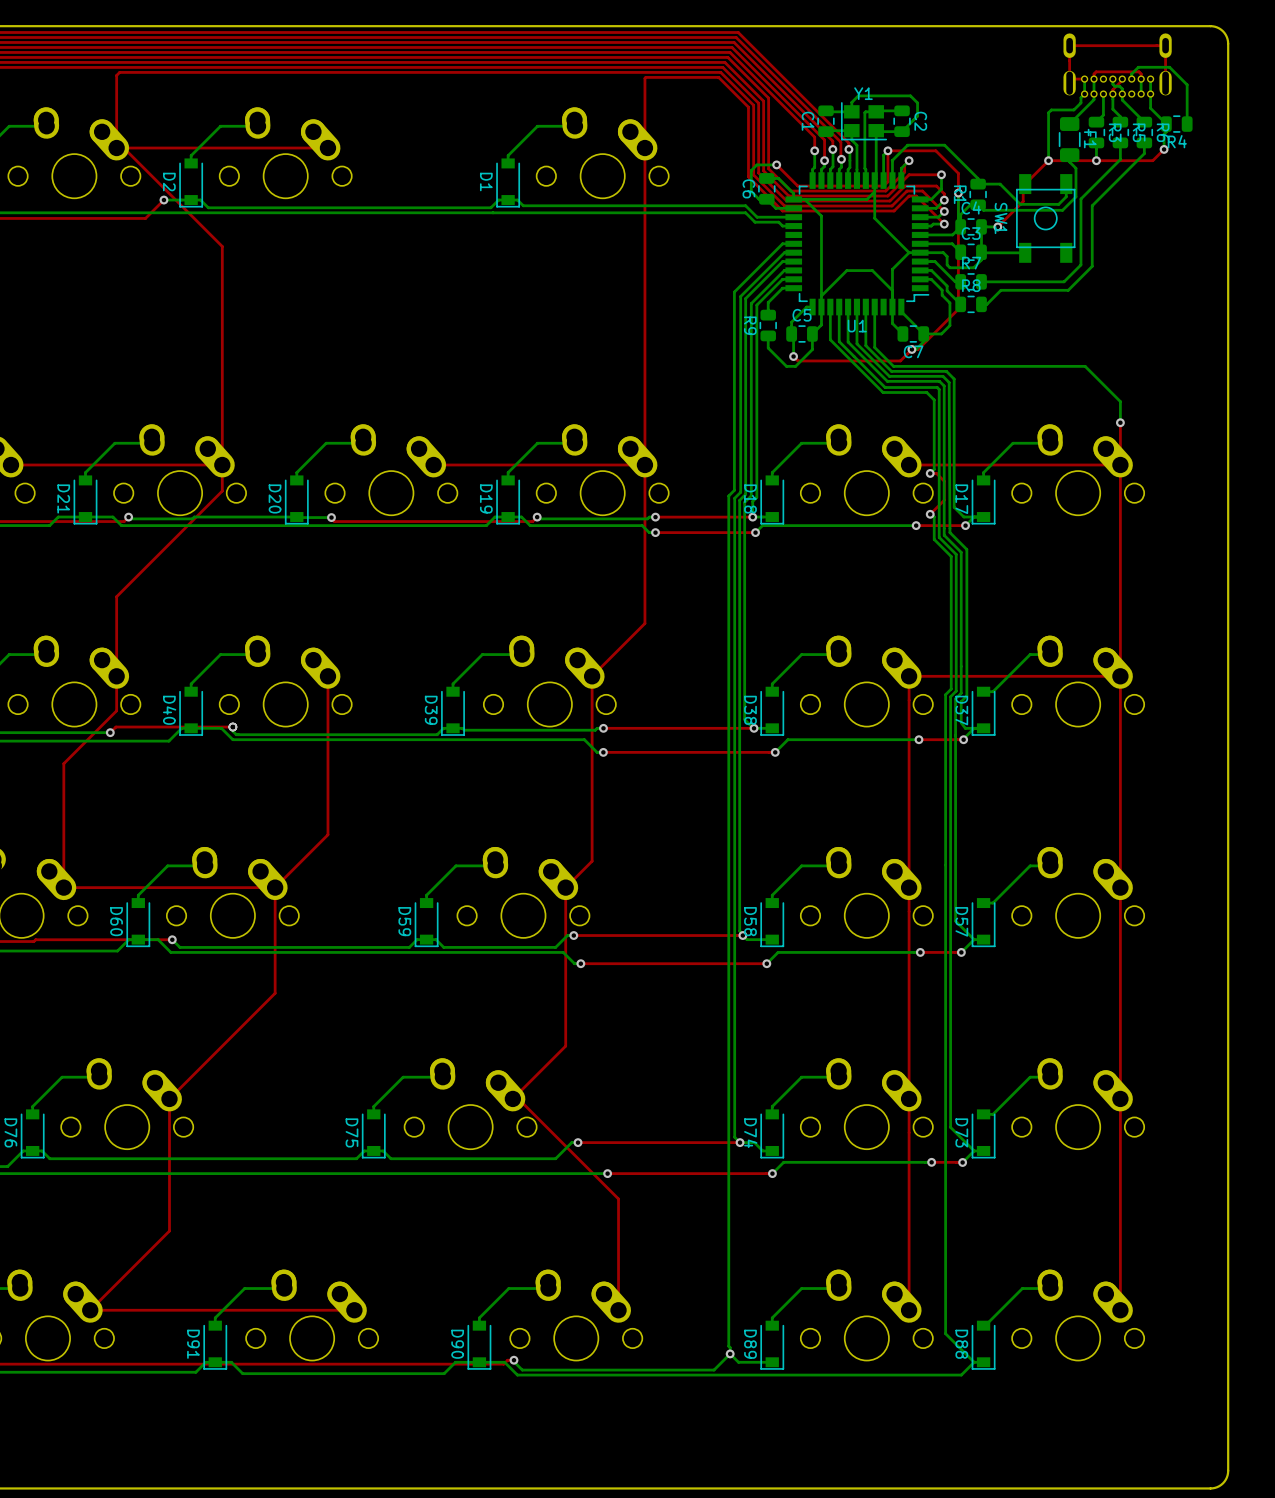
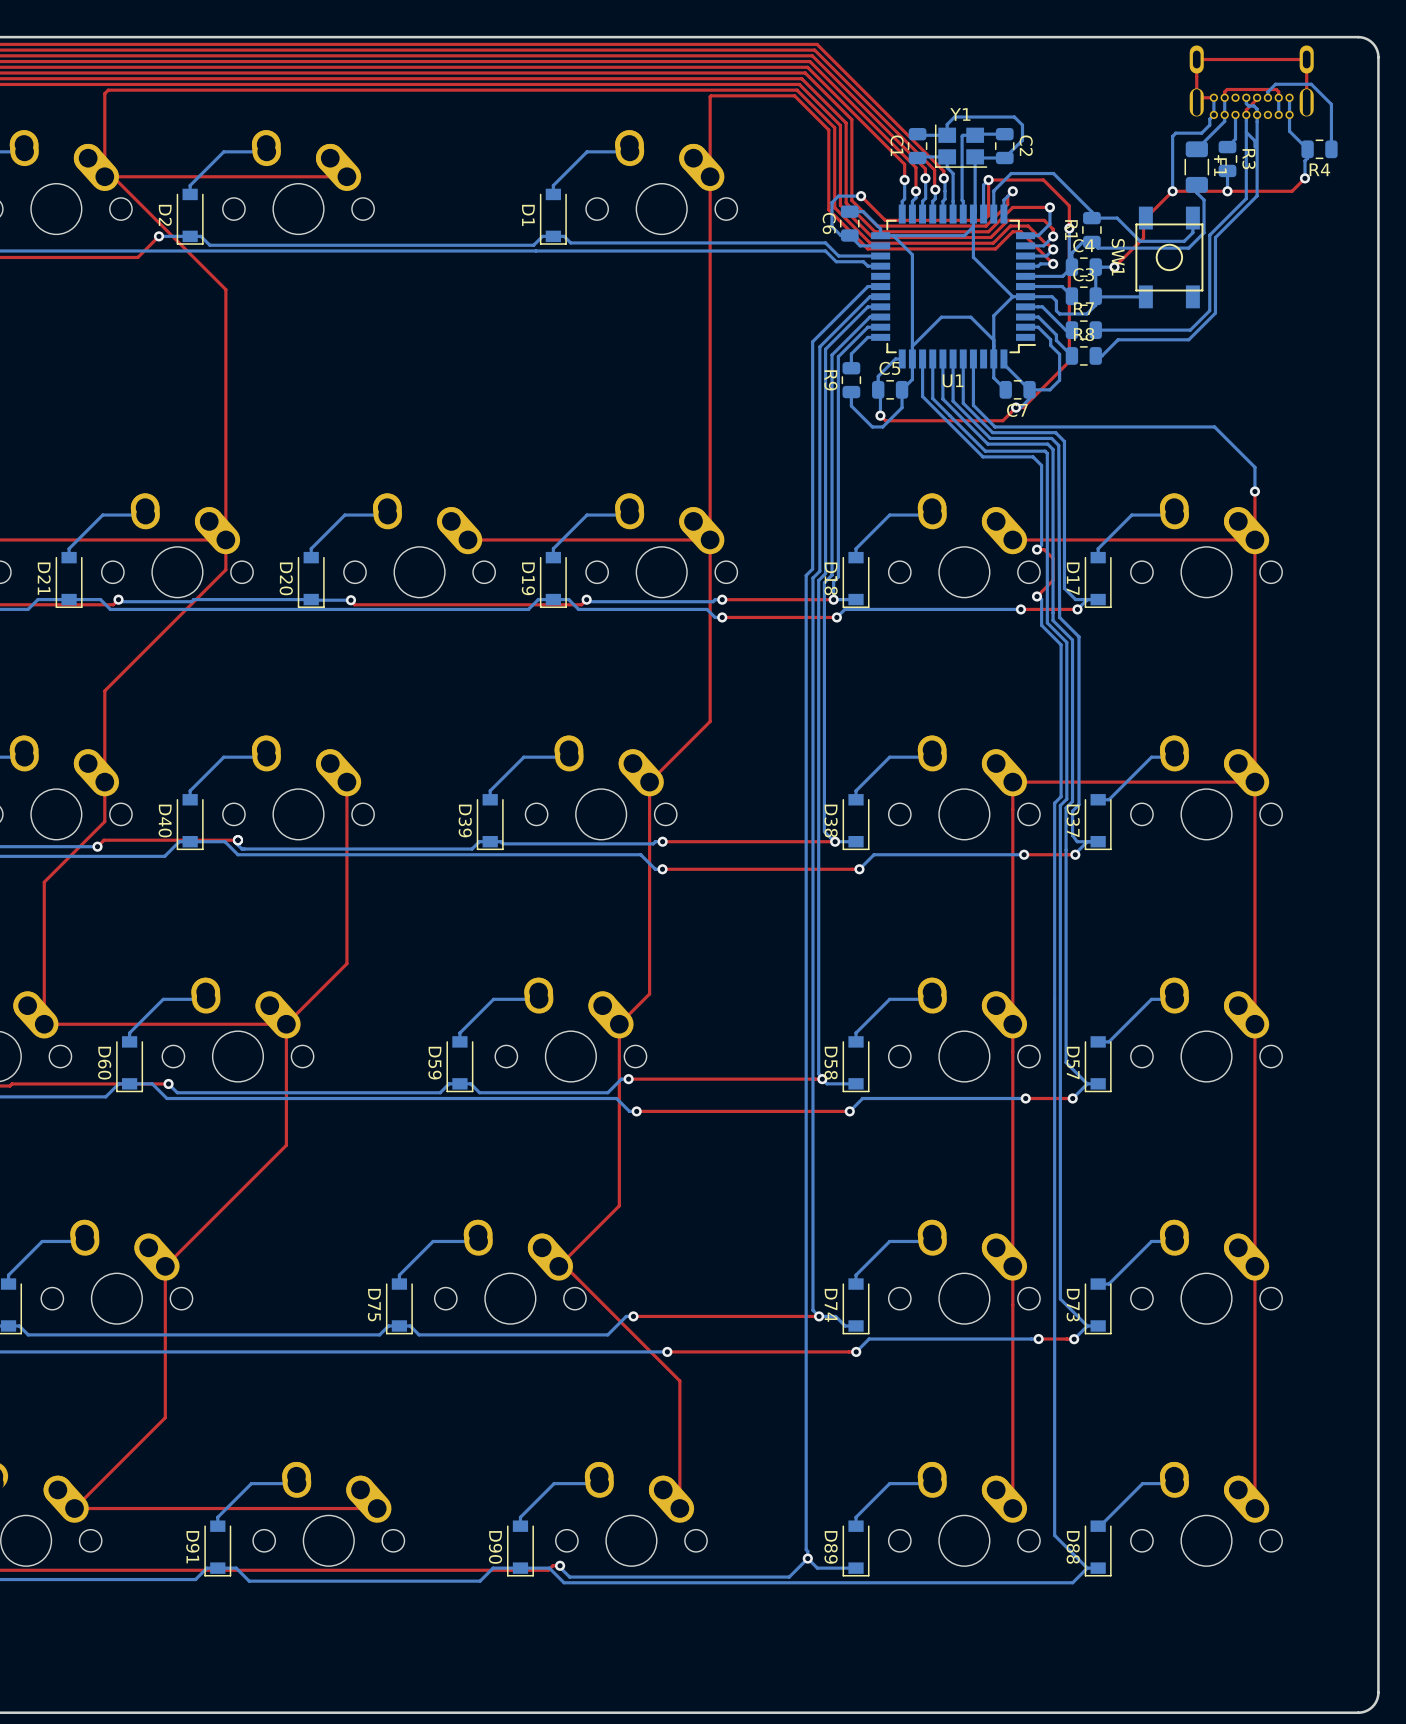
bottom track: (1122, 100) (1144, 122) -> none
R5: (1120, 132) -> none
R6: (1144, 132) -> none
bottom track: (1120, 142) (1120, 159) (1112, 167) -> (1246, 132) (1246, 198)
bottom track: (1144, 142) (1144, 153) (1092, 205) (1092, 266) (1068, 290) (1062, 290) -> (1257, 121) (1257, 195) (1215, 237) (1215, 313) (1188, 339)

